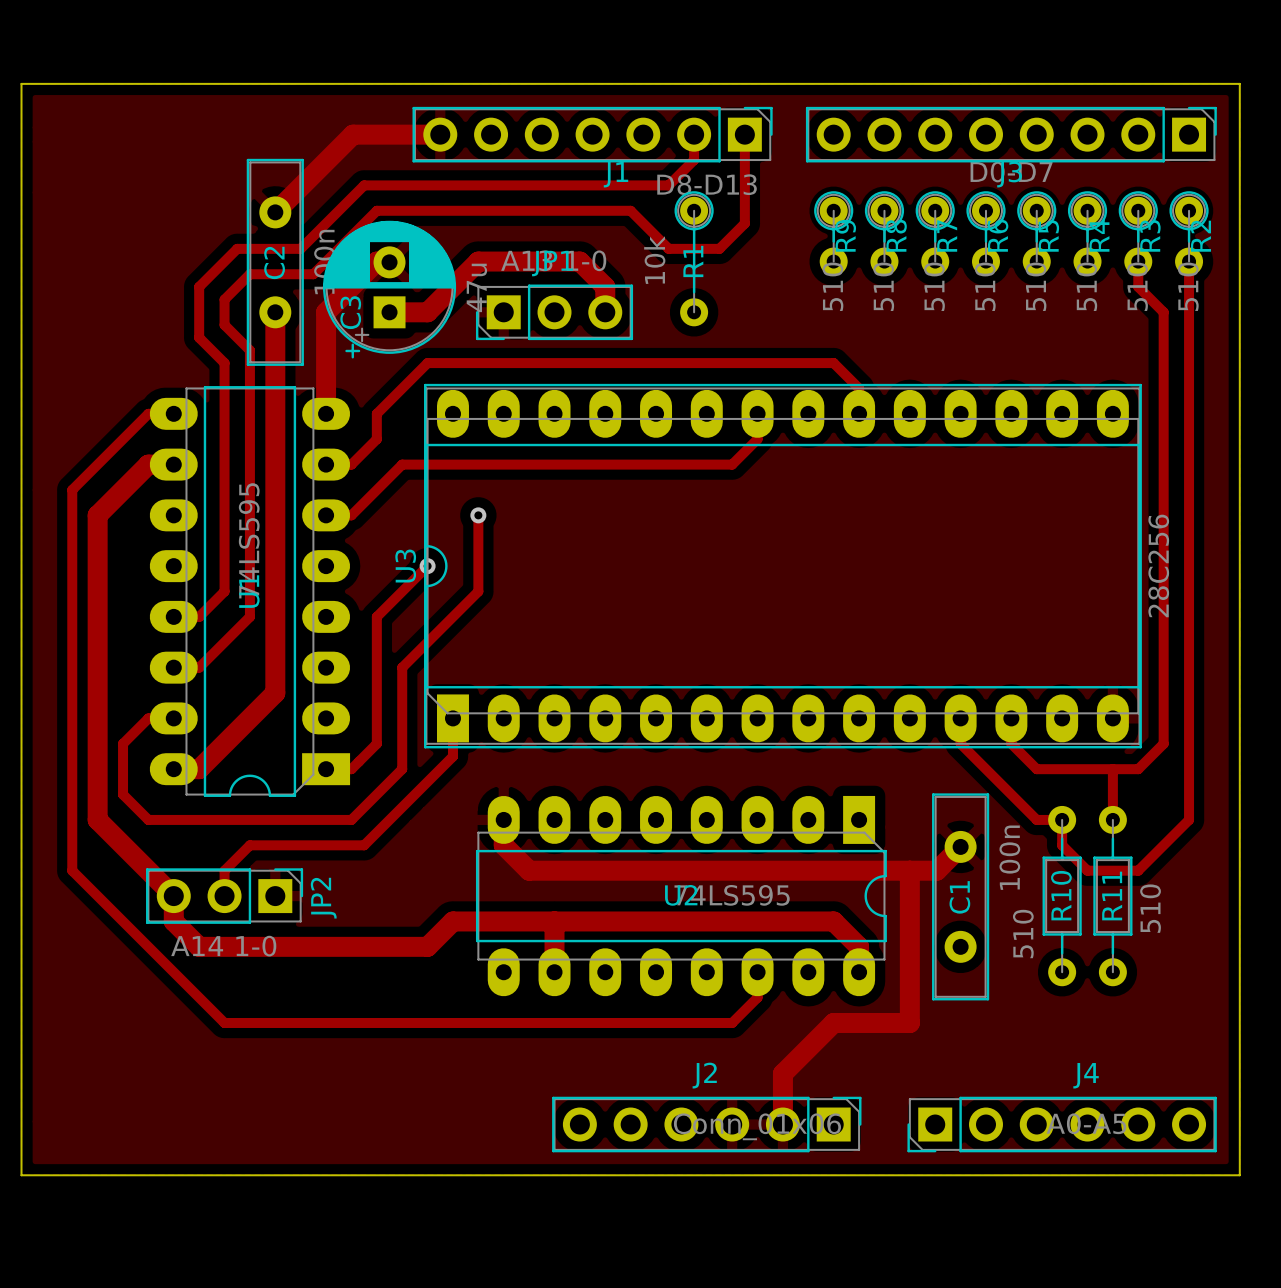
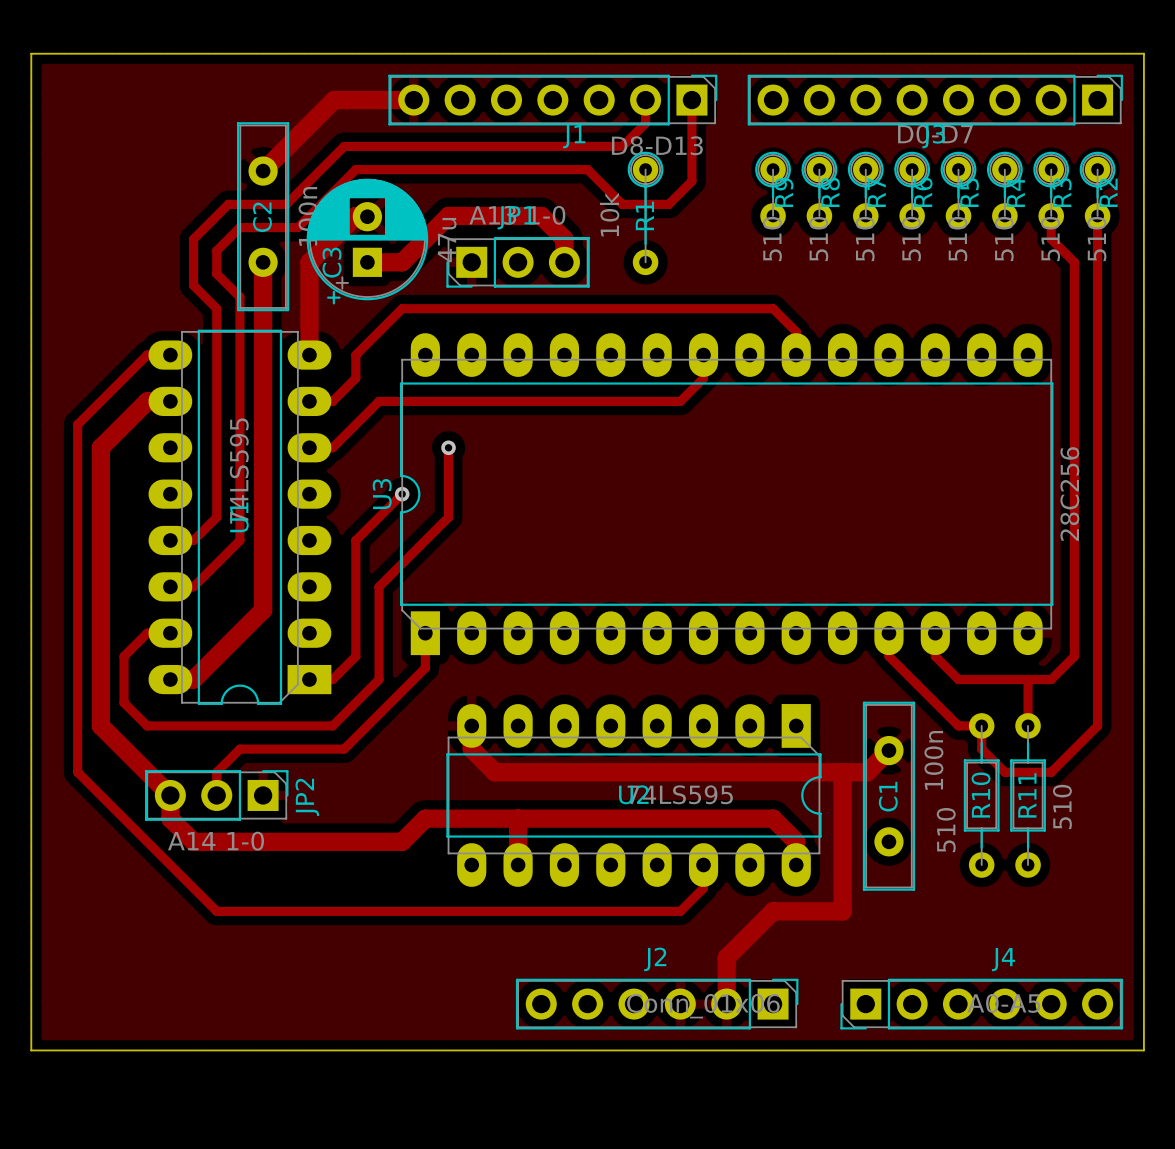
U3 footprint: [424, 383, 1142, 749] -> [399, 333, 1054, 656]

